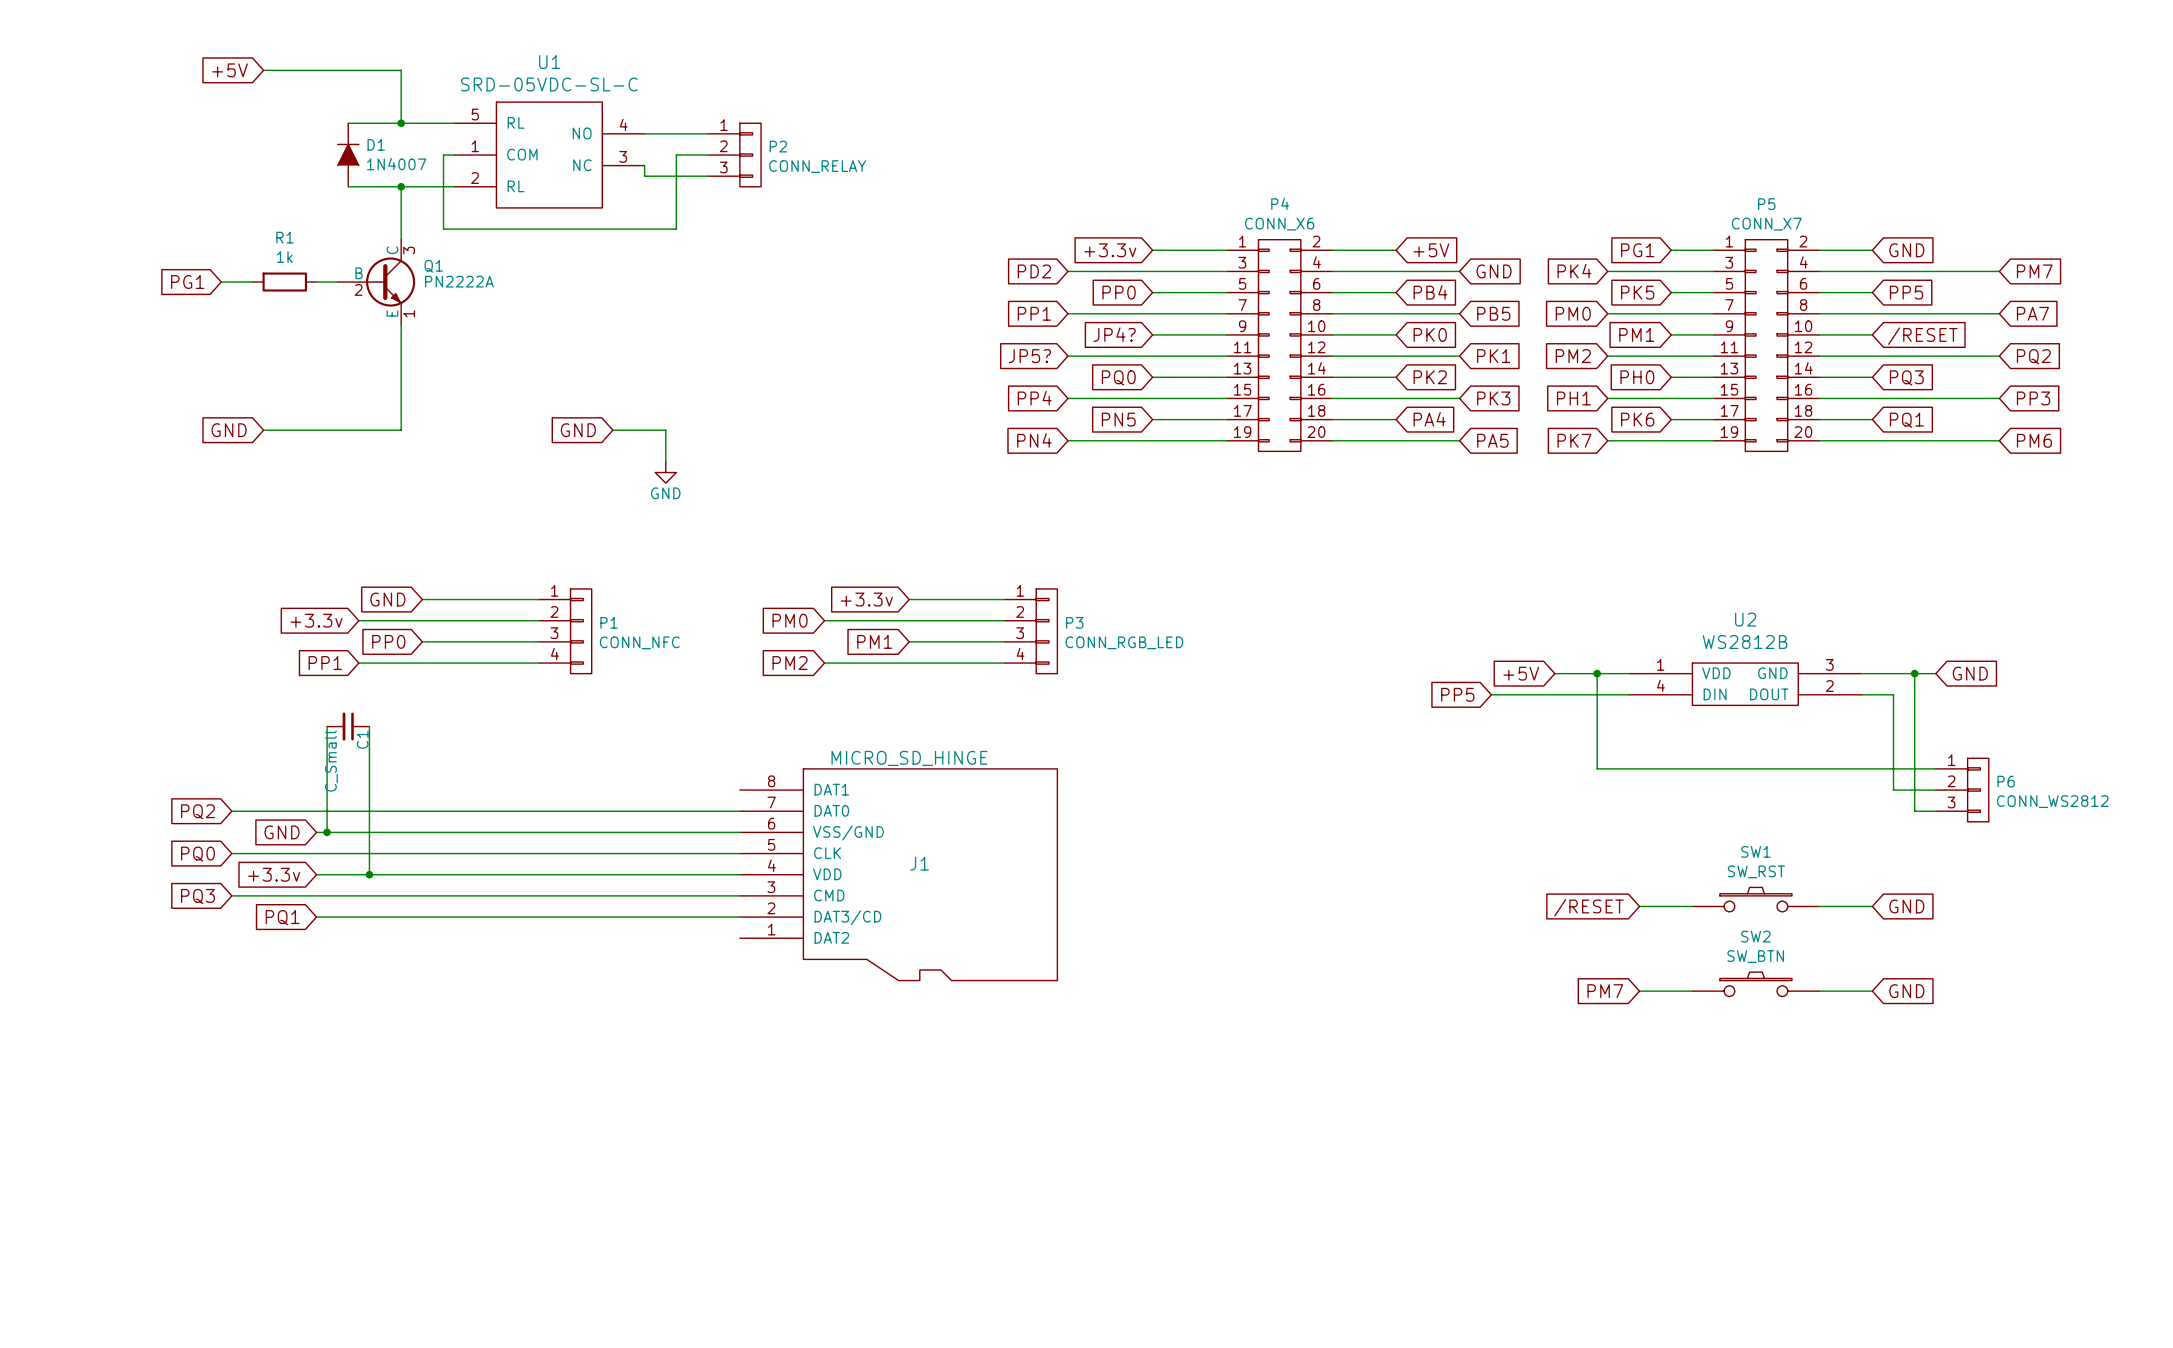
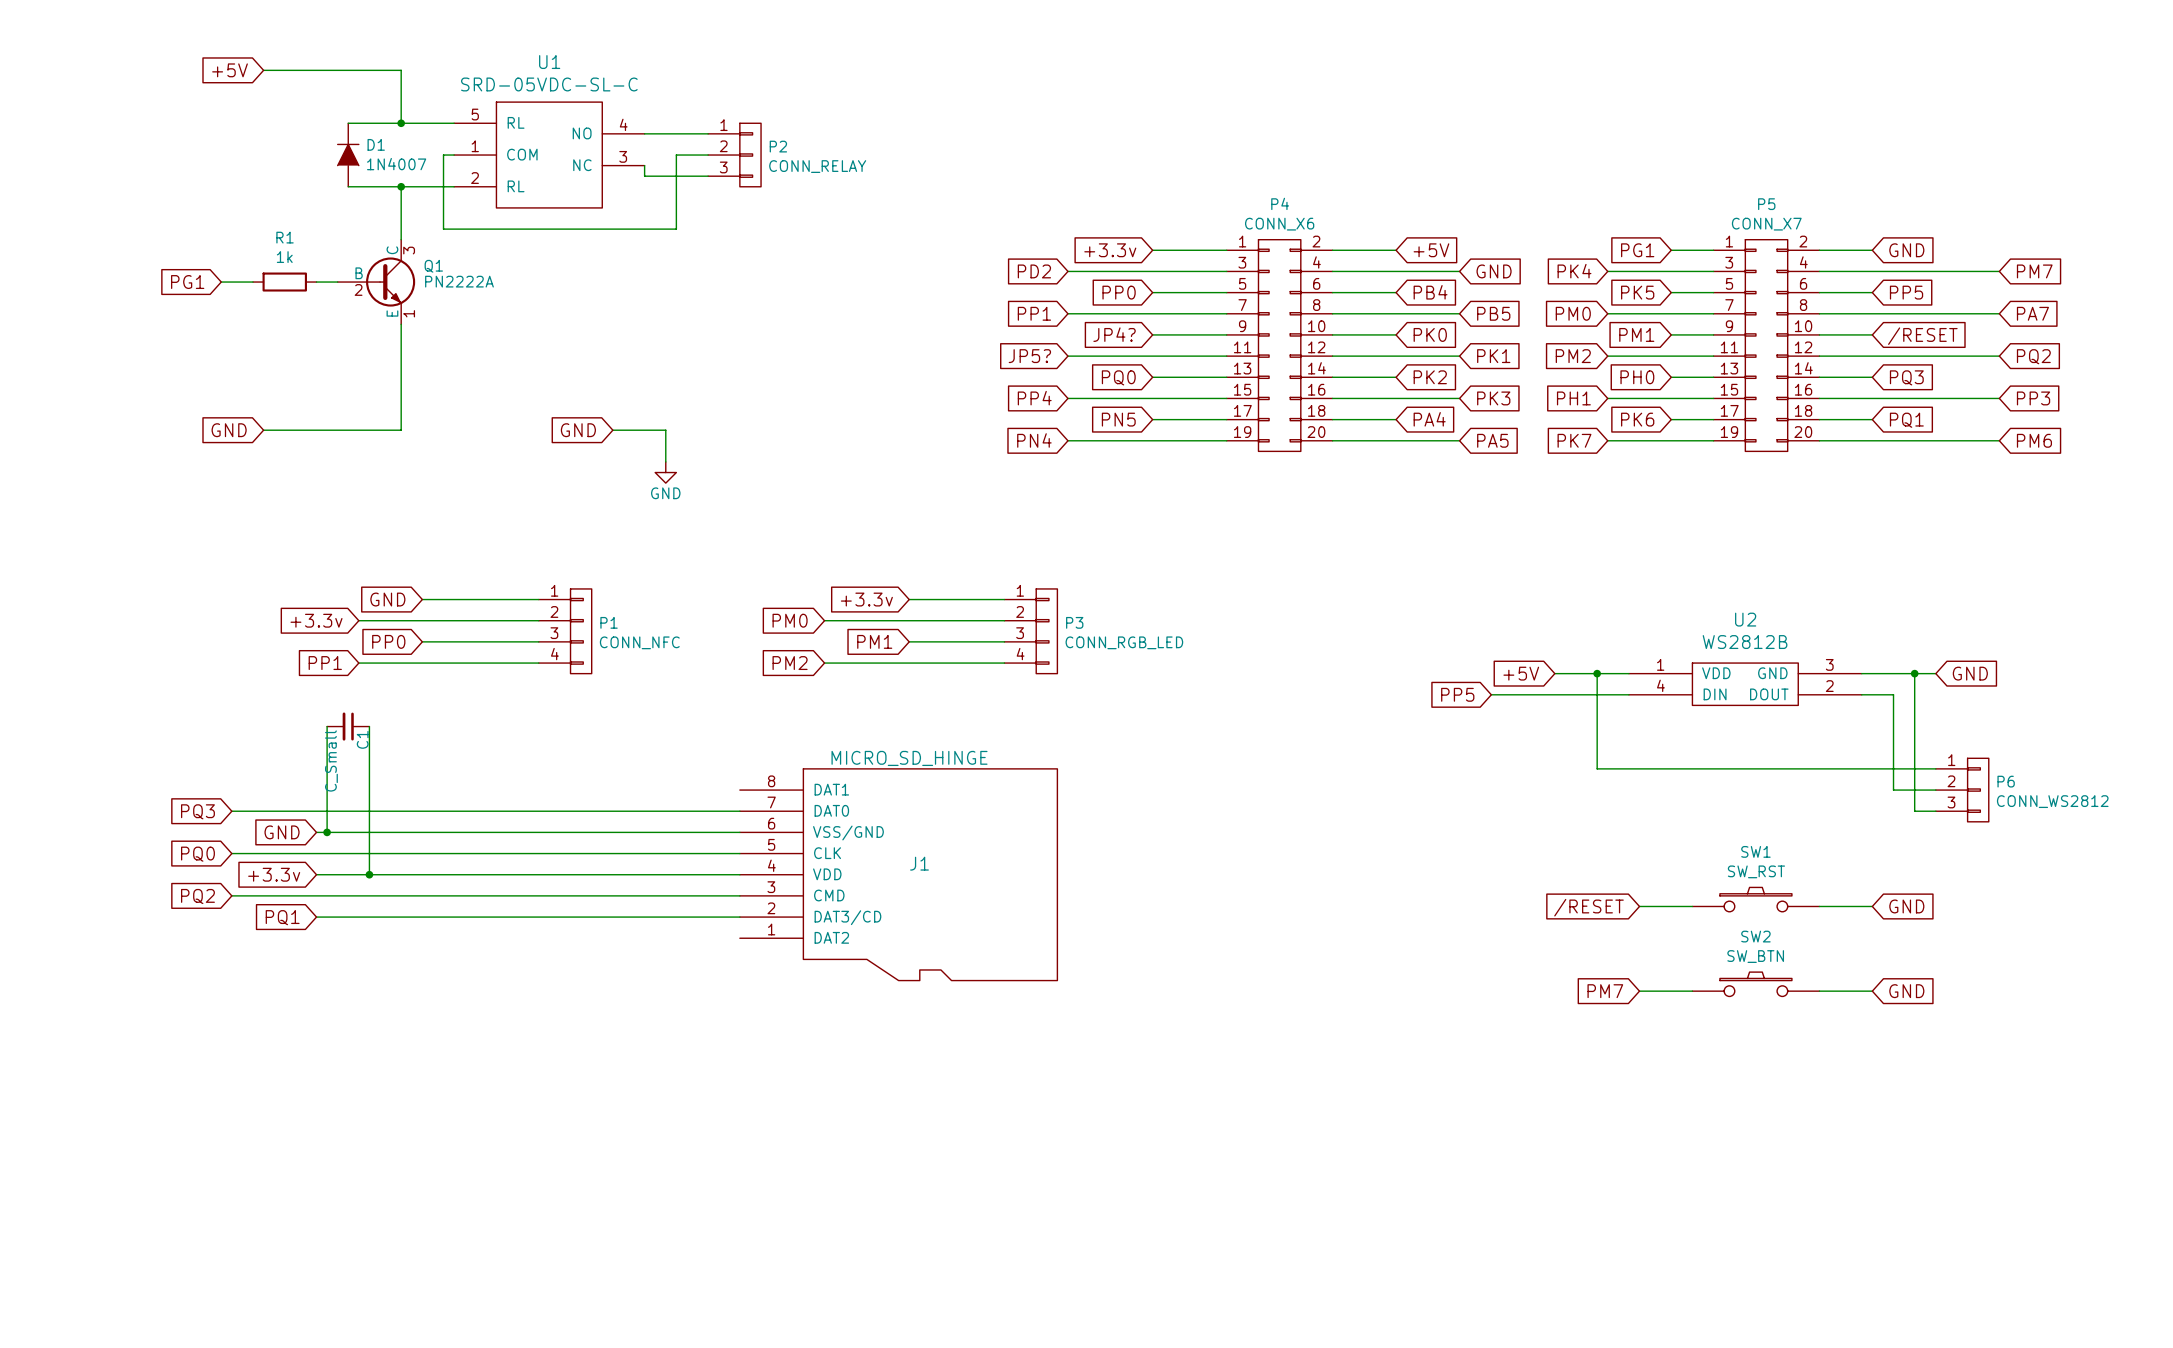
global label: PQ2 (197, 811) -> PQ3 (197, 811)
global label: PQ3 (197, 896) -> PQ2 (197, 896)

